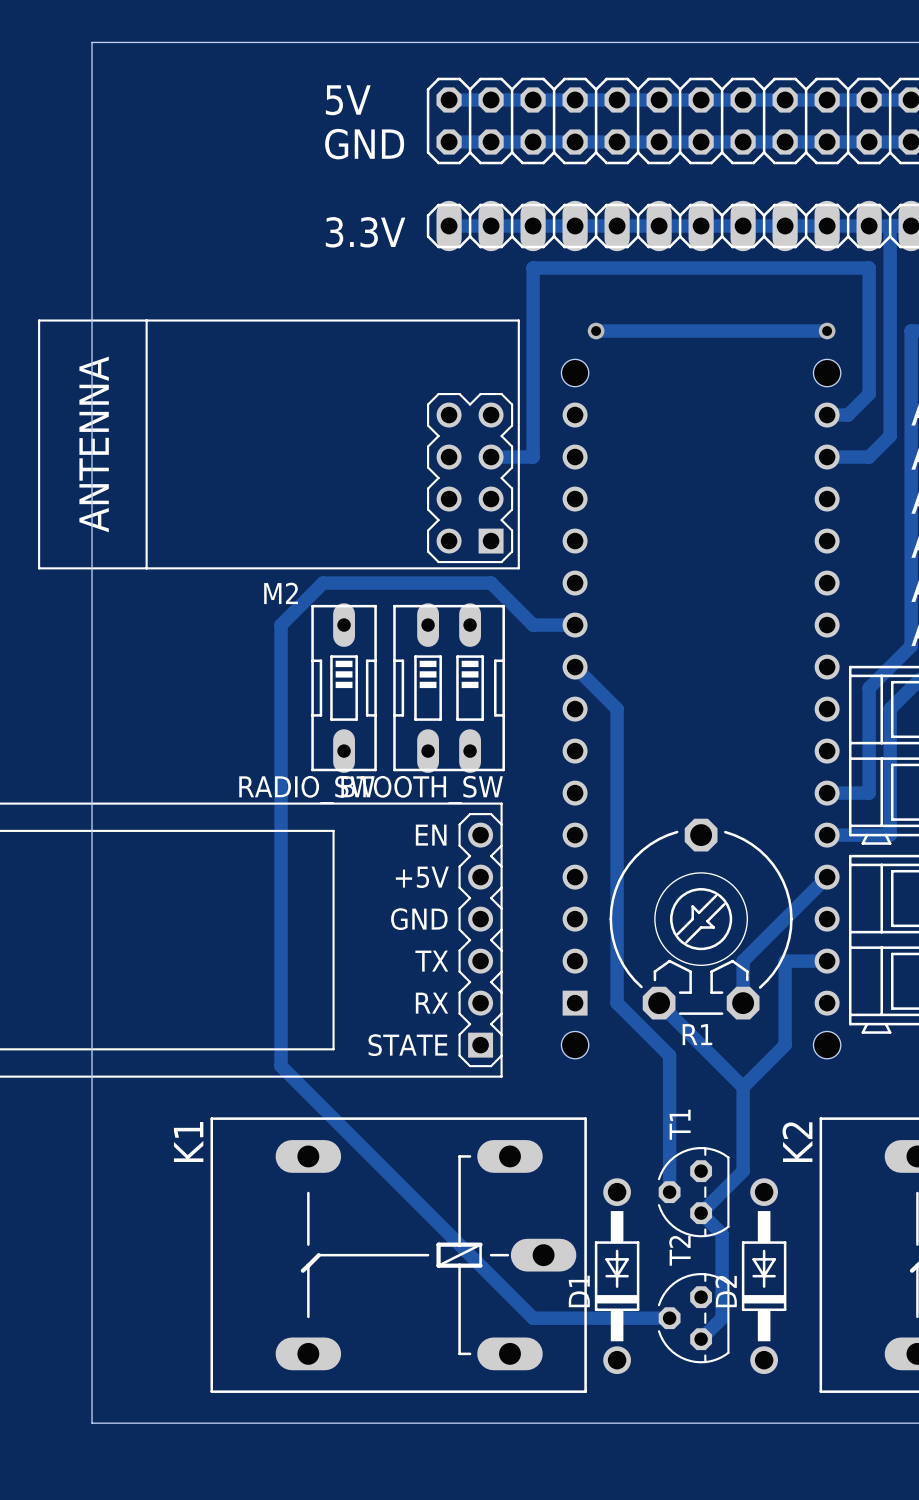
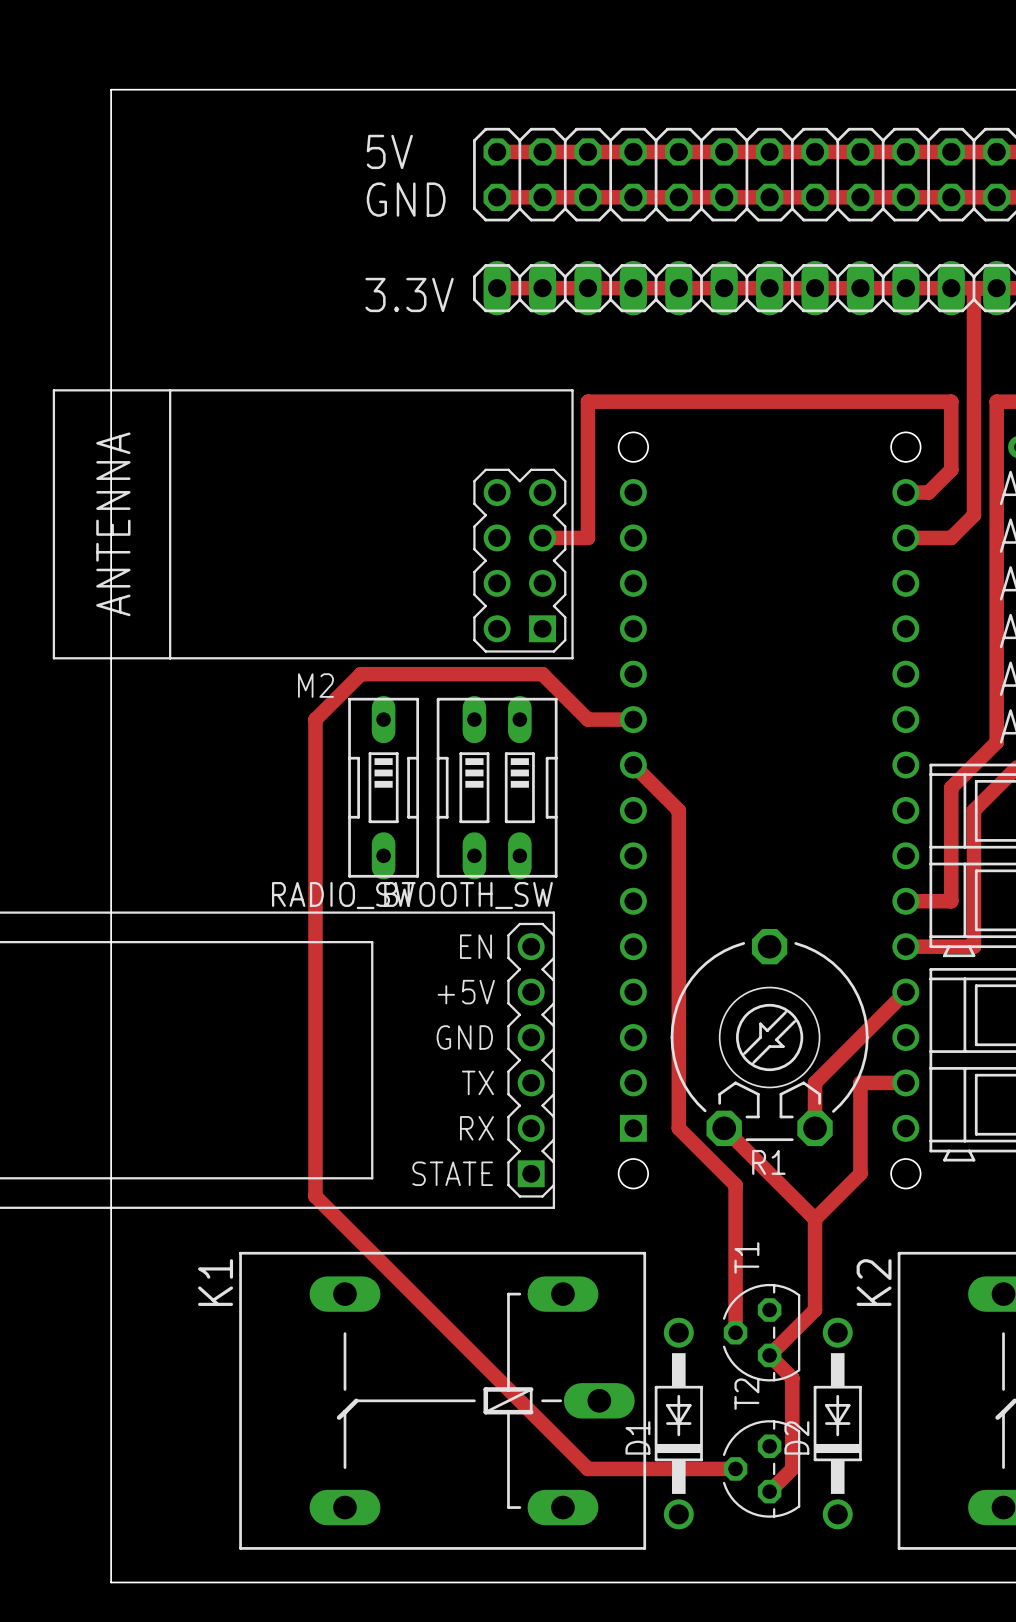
track: (533, 331) (533, 268) (869, 268) (869, 331) -> (587, 401) (656, 401)
via: (596, 331) -> none
track: none -> (905, 401) (951, 401)
via: (827, 331) -> none

